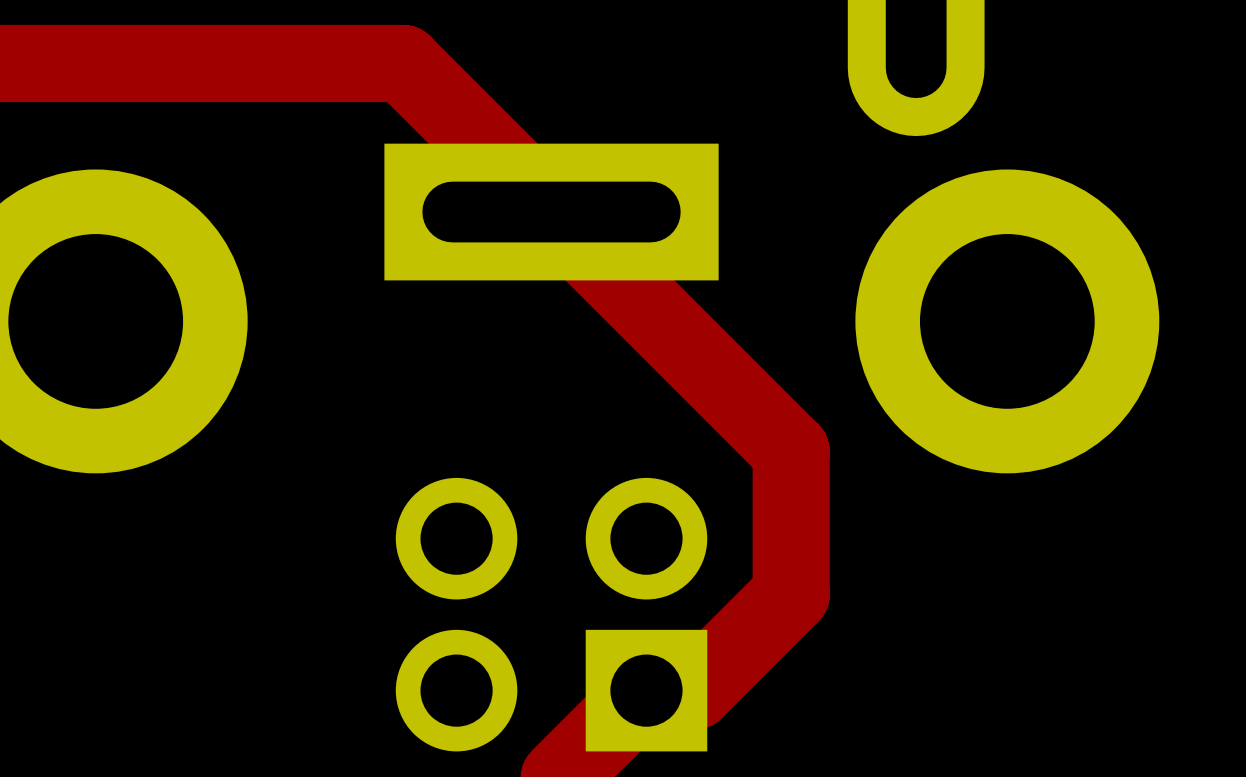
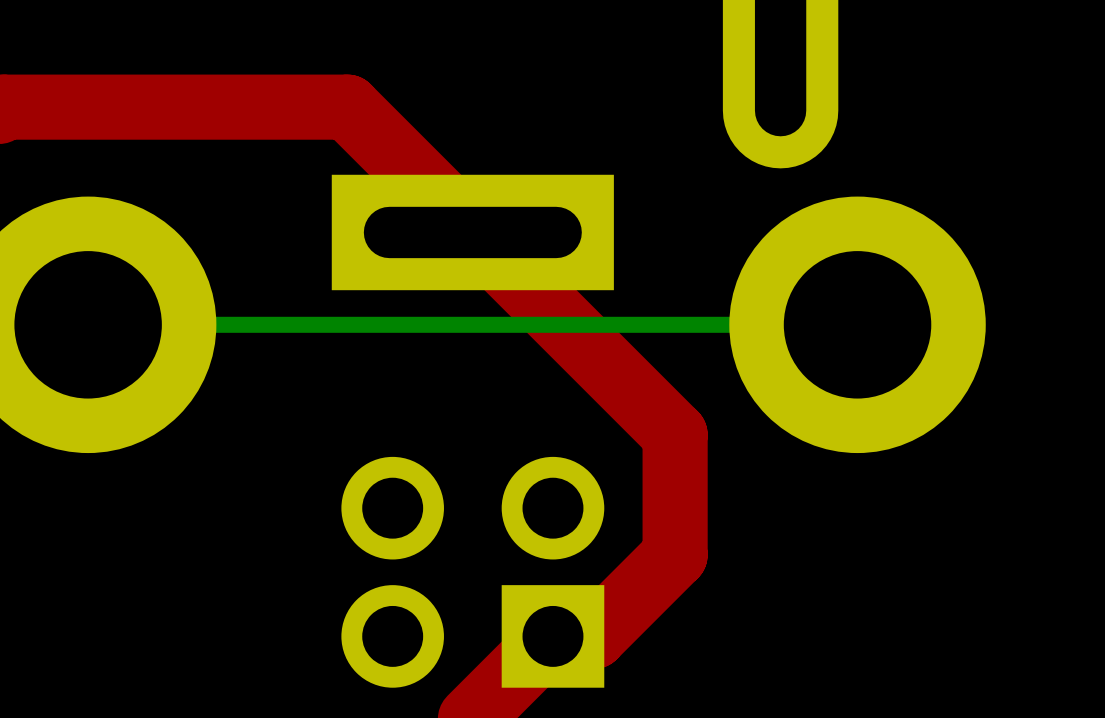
bottom track: none -> (857, 324) (88, 324)

